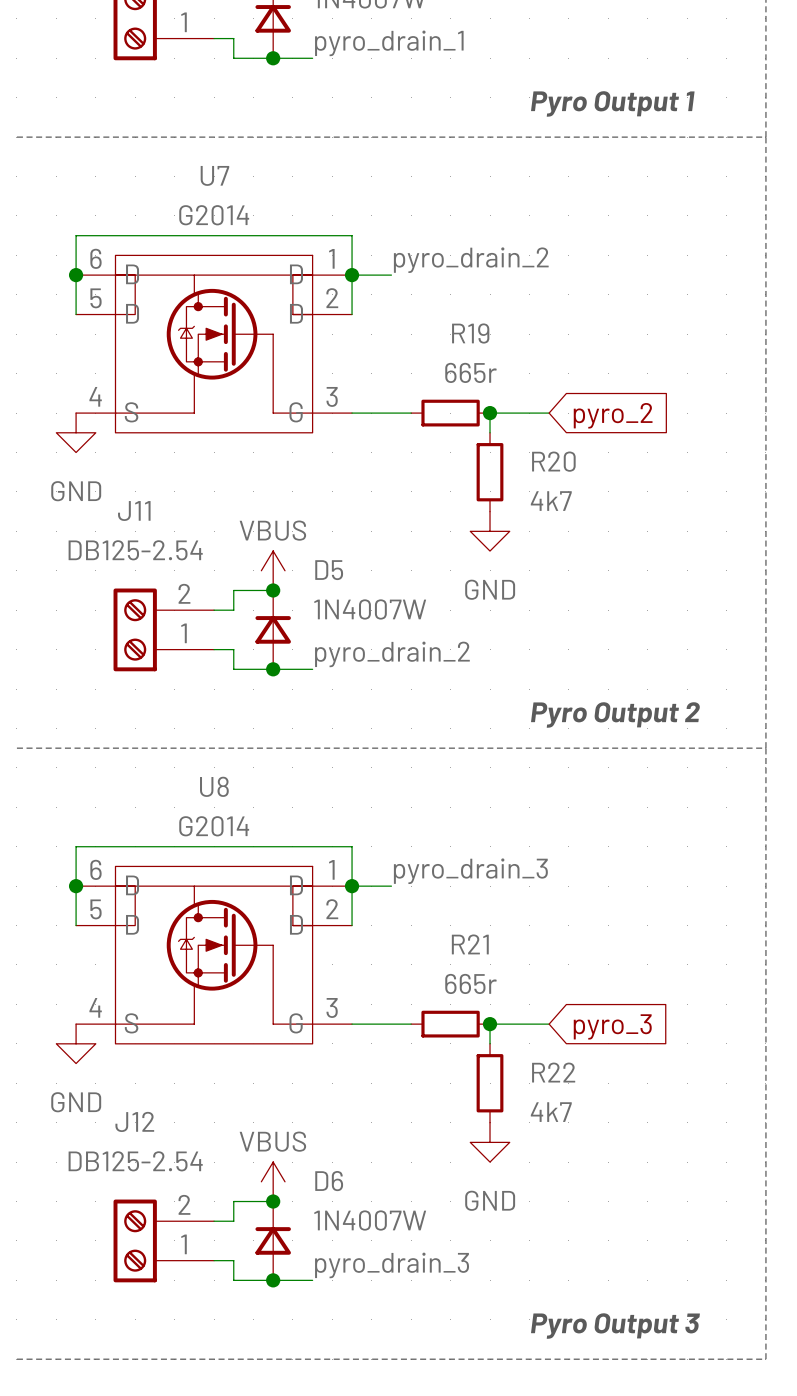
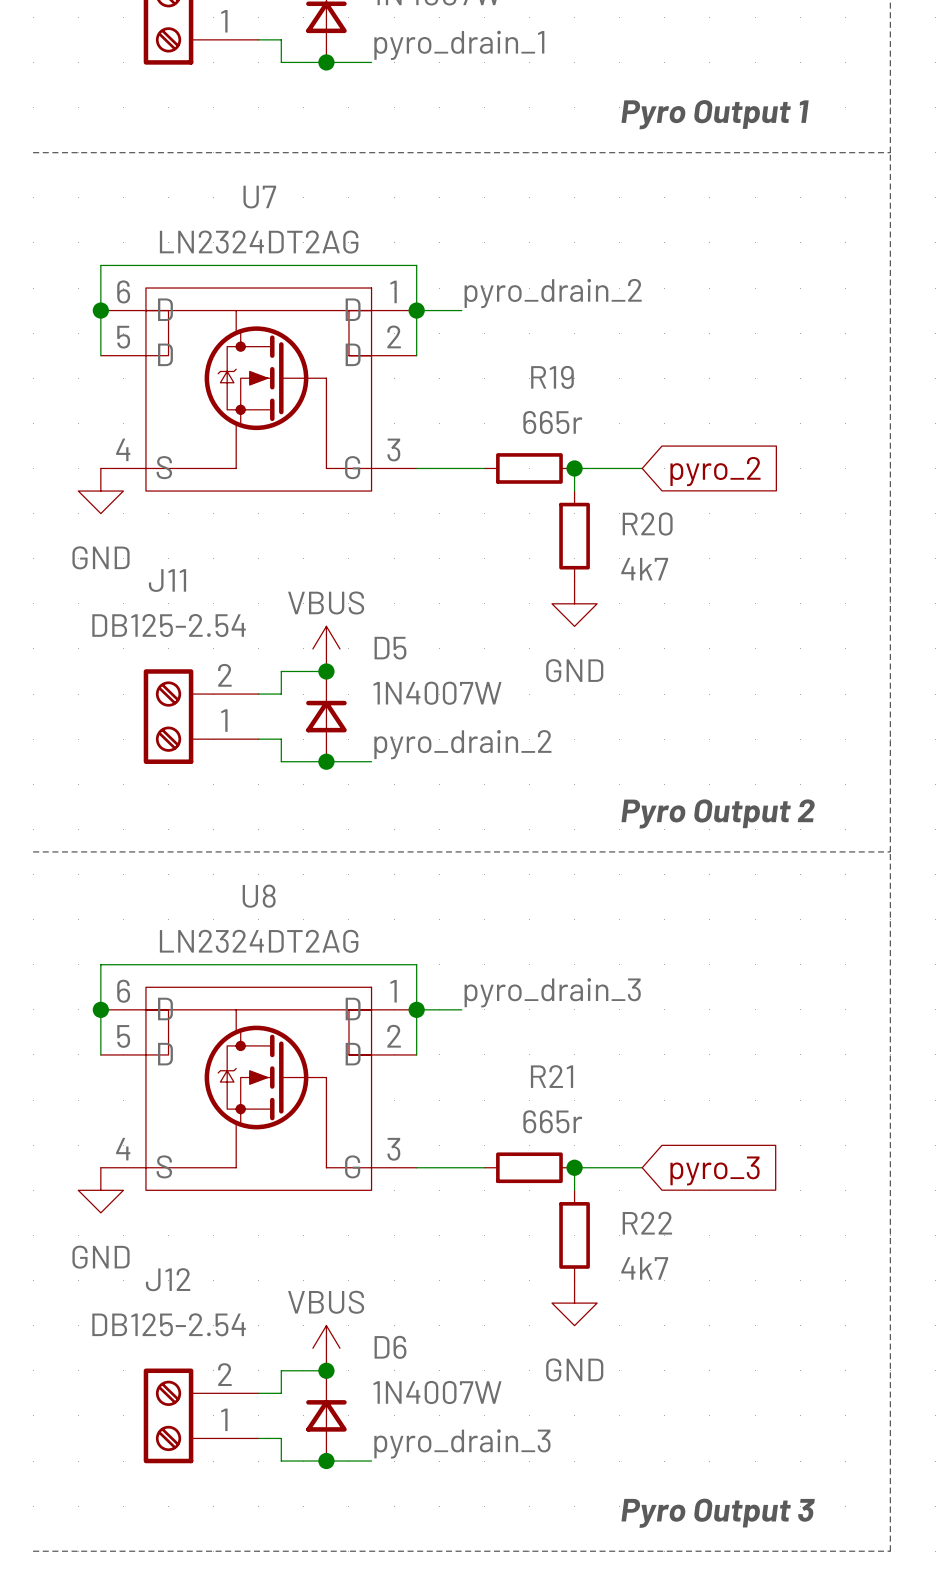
U7 value: G2014 (214, 215) -> LN2324DT2AG (259, 242)
U8 value: G2014 (214, 826) -> LN2324DT2AG (259, 941)

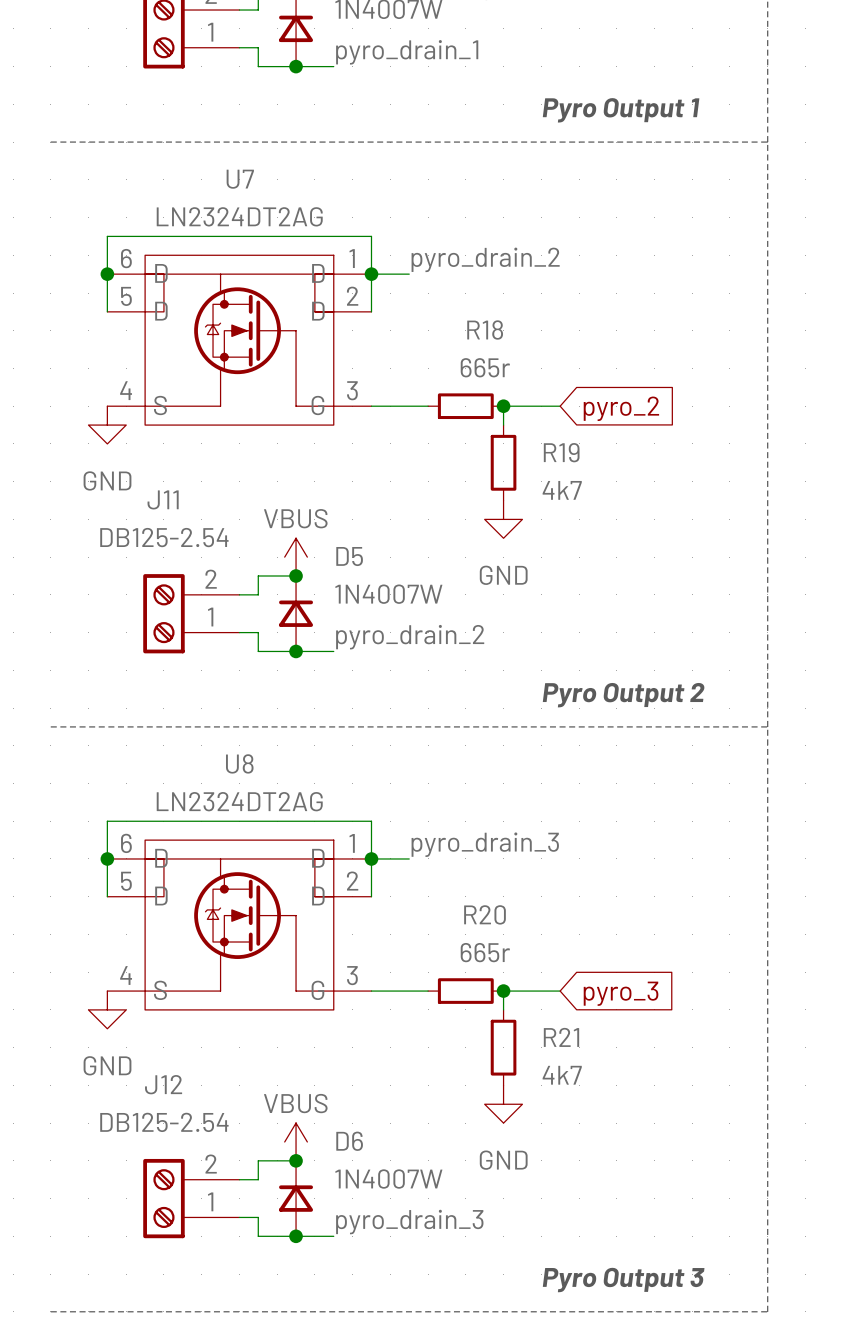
R19 name: R19 (552, 377) -> R18 (485, 330)
R20 name: R20 (647, 524) -> R19 (561, 452)
R21 name: R21 (552, 1076) -> R20 (485, 914)
R22 name: R22 (647, 1223) -> R21 (561, 1037)

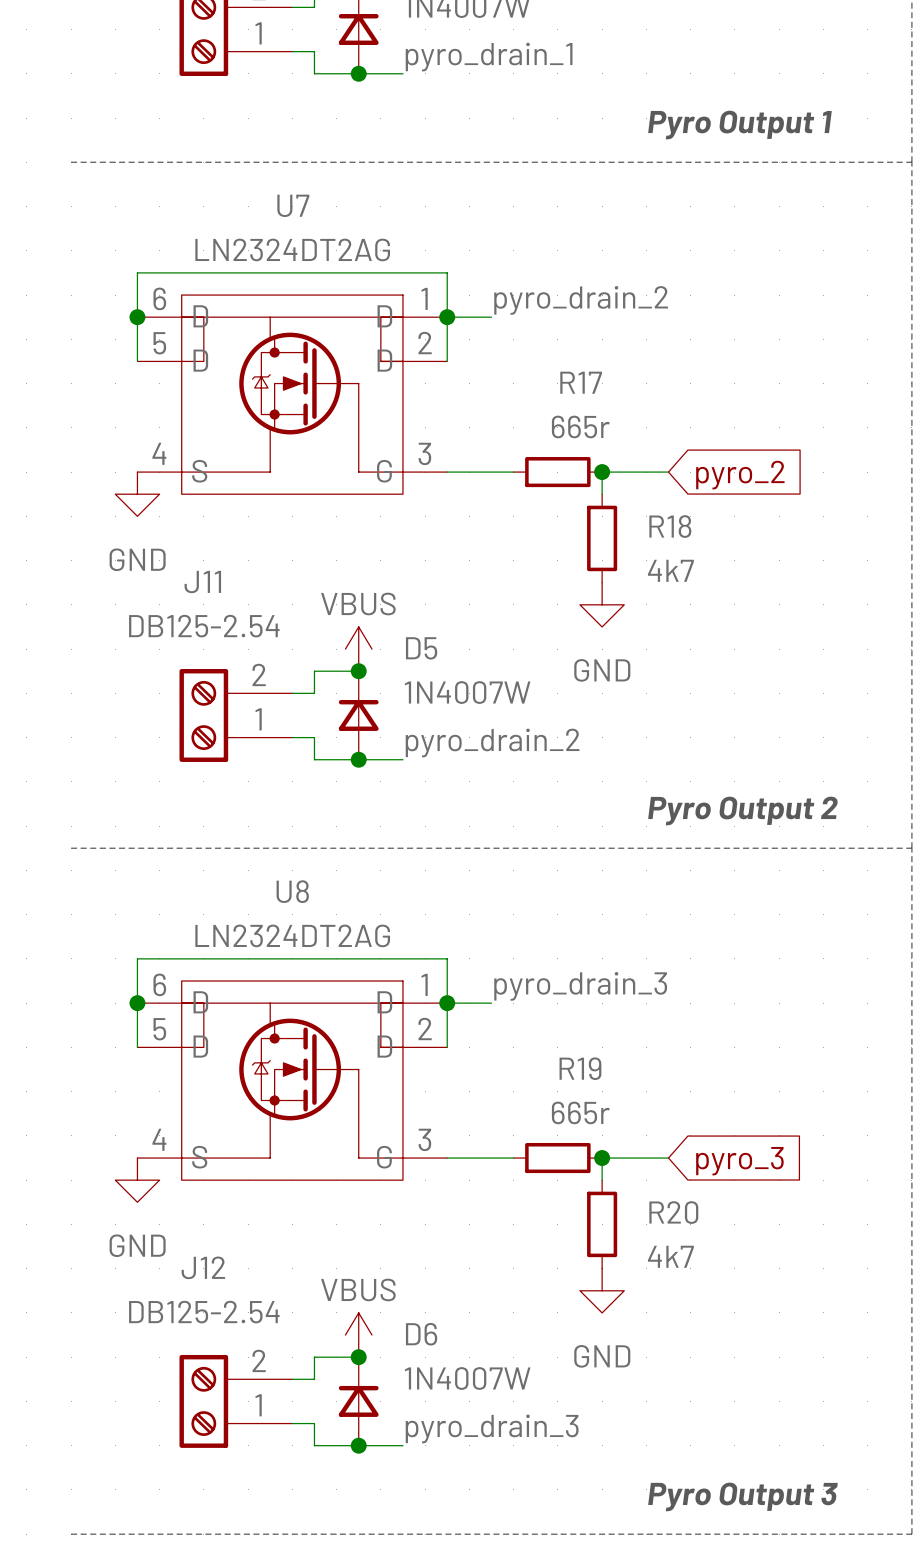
R18 name: R18 (485, 330) -> R17 (581, 382)
R19 name: R19 (561, 452) -> R18 (670, 526)
R20 name: R20 (485, 914) -> R19 (580, 1068)
R21 name: R21 (561, 1037) -> R20 (673, 1212)

